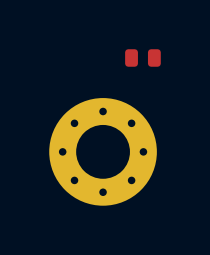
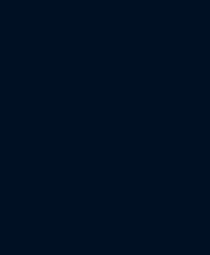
part: (142, 57) -> none
part: (103, 151) -> none

